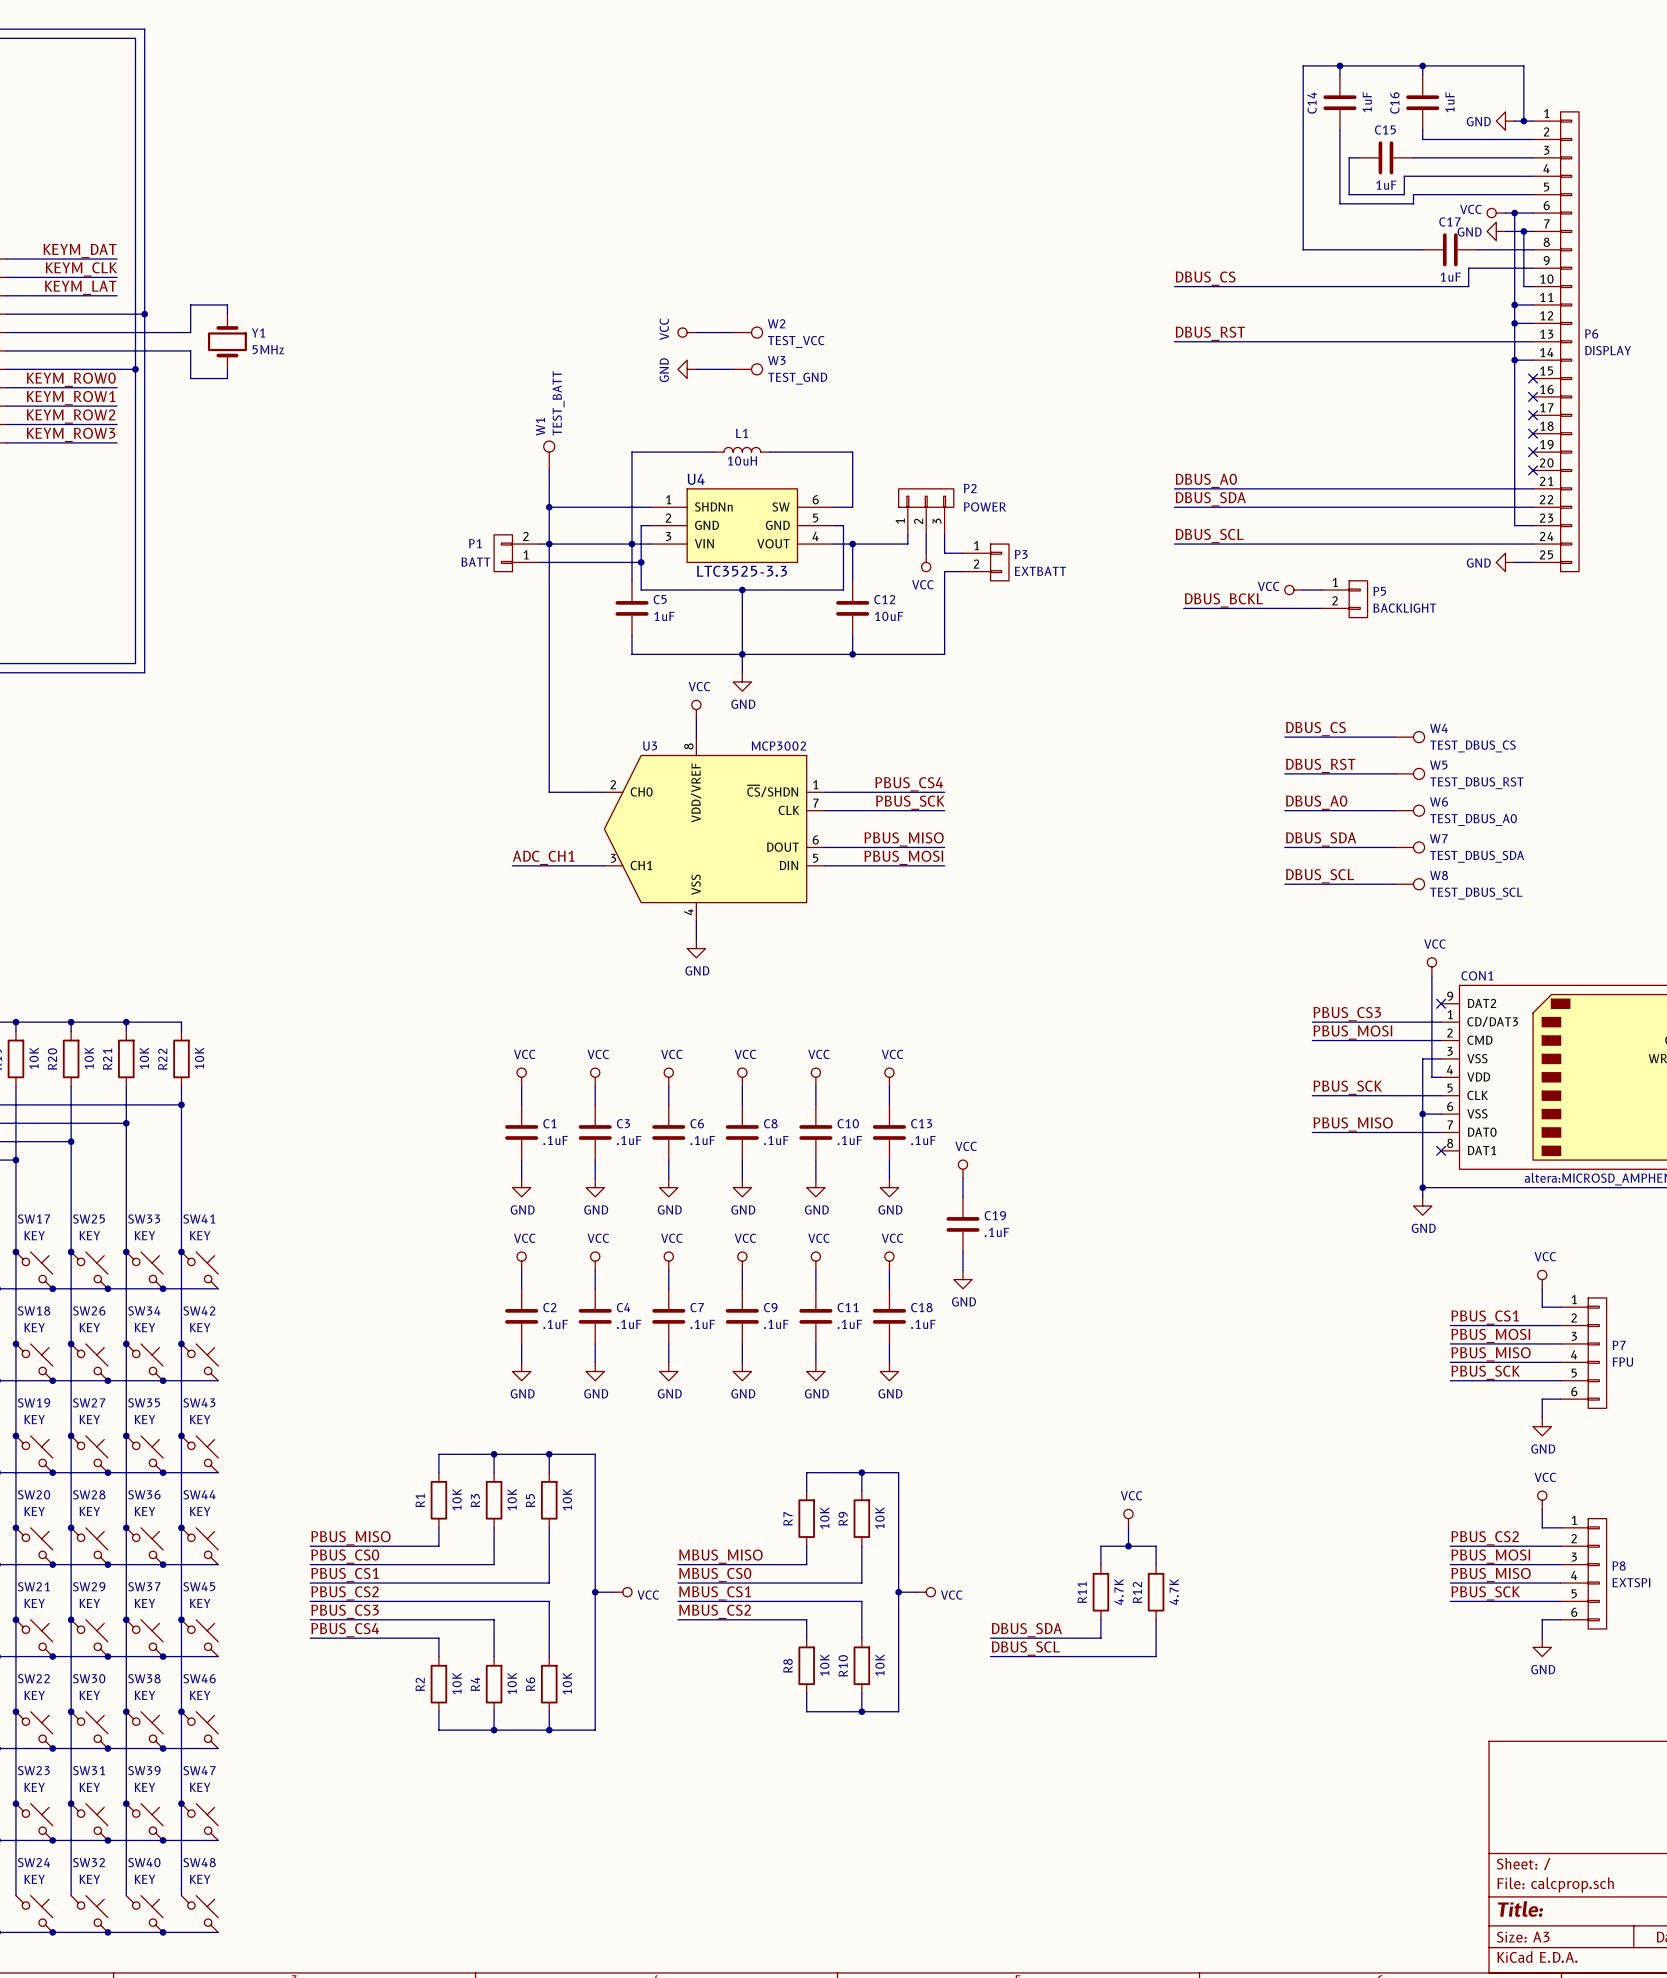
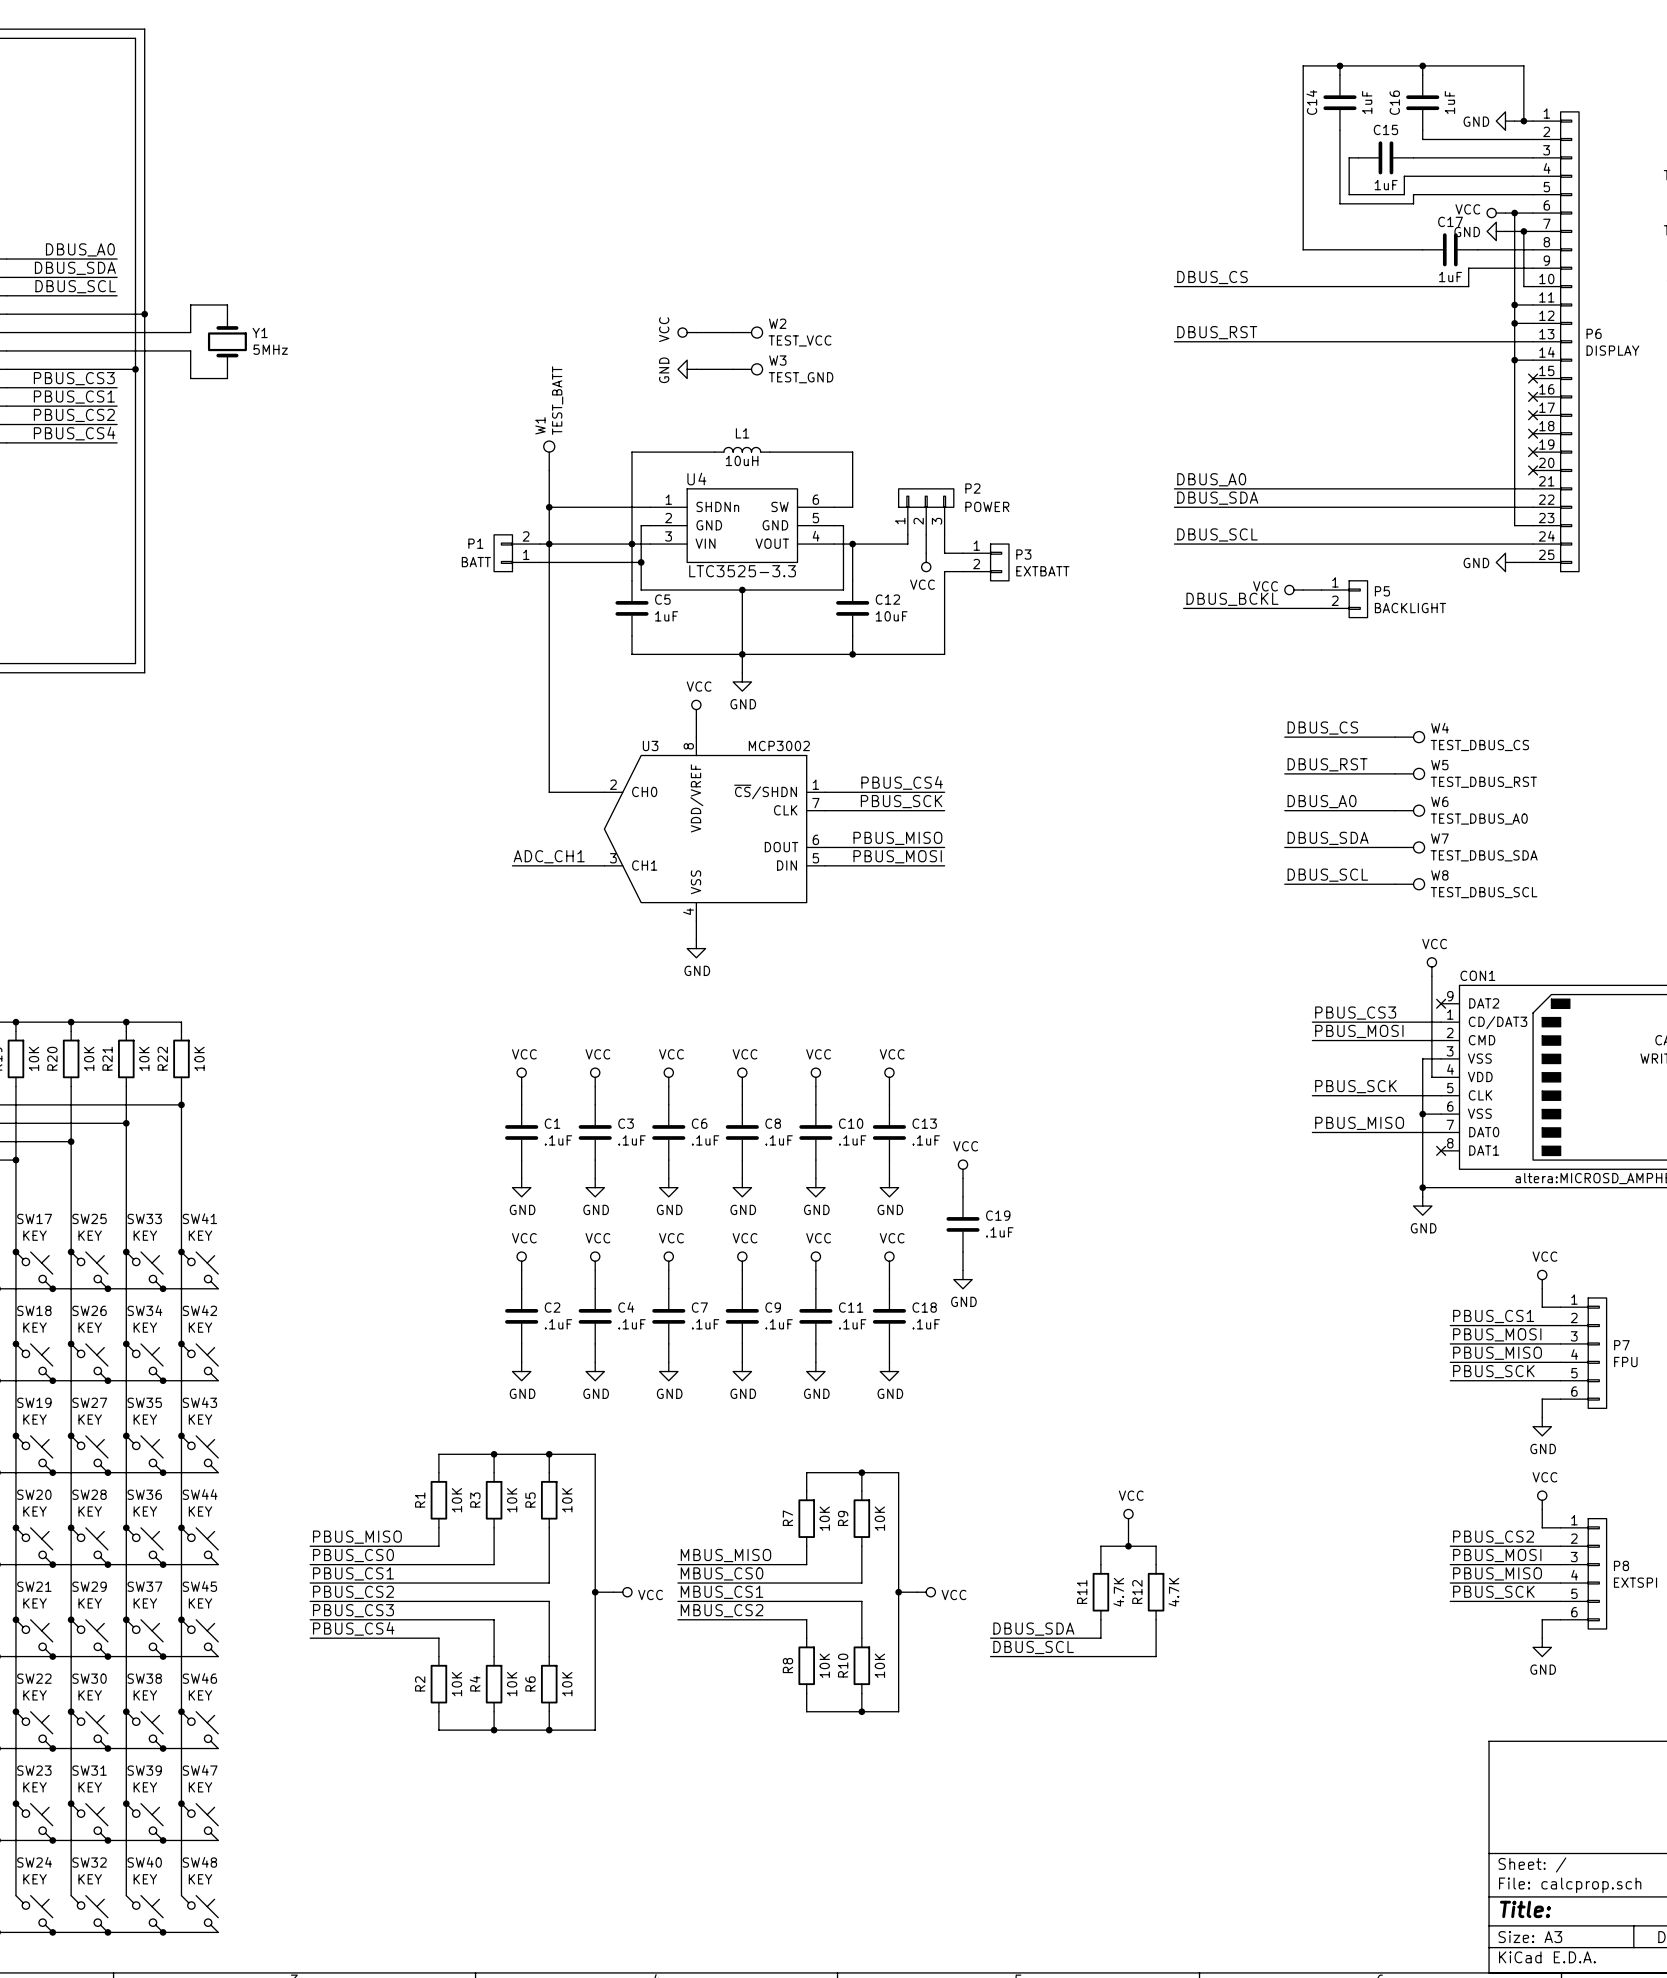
label: KEYM_DAT (80, 251) -> DBUS_A0 (80, 249)
label: KEYM_CLK (81, 269) -> DBUS_SDA (75, 268)
label: KEYM_LAT (80, 287) -> DBUS_SCL (75, 286)
label: KEYM_ROW0 (71, 379) -> PBUS_CS3 (74, 378)
label: KEYM_ROW1 (71, 398) -> PBUS_CS1 (74, 397)
label: KEYM_ROW2 (71, 416) -> PBUS_CS2 (74, 415)
label: KEYM_ROW3 (71, 434) -> PBUS_CS4 (74, 433)

